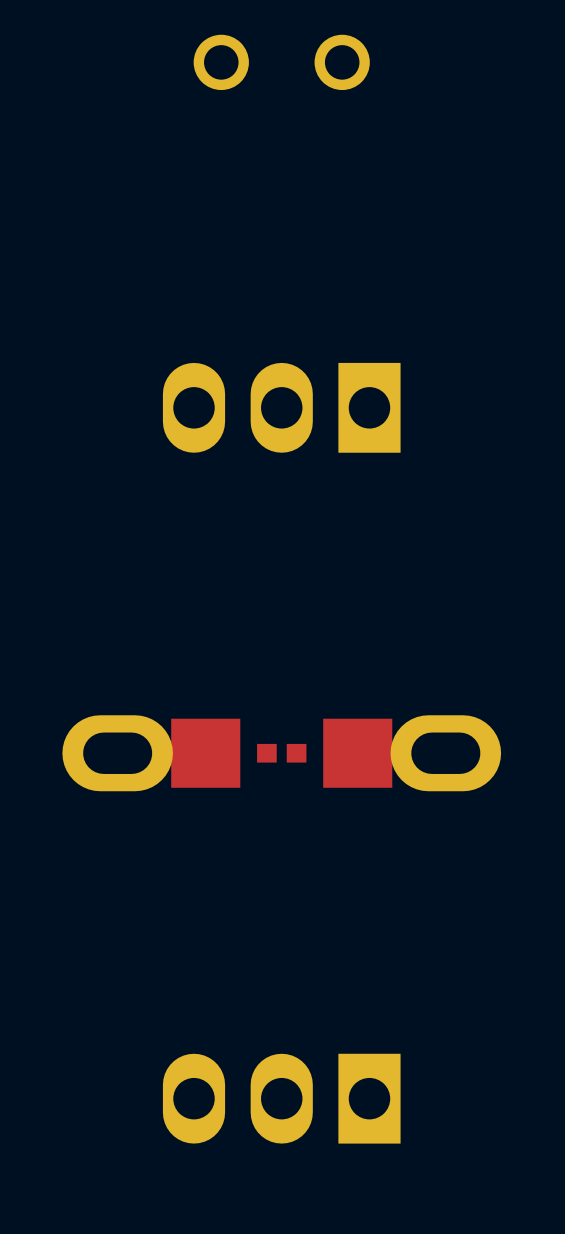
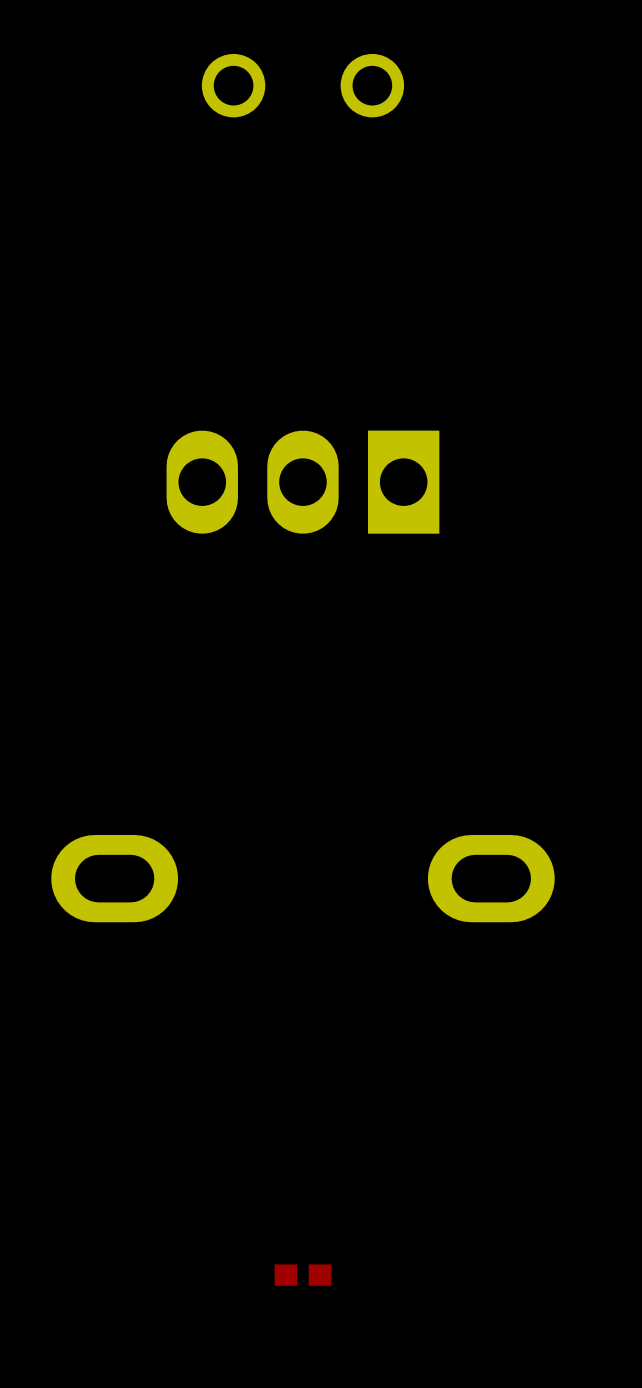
part: (281, 753) -> none
part: (281, 753) -> none
part: (281, 1098) -> none

